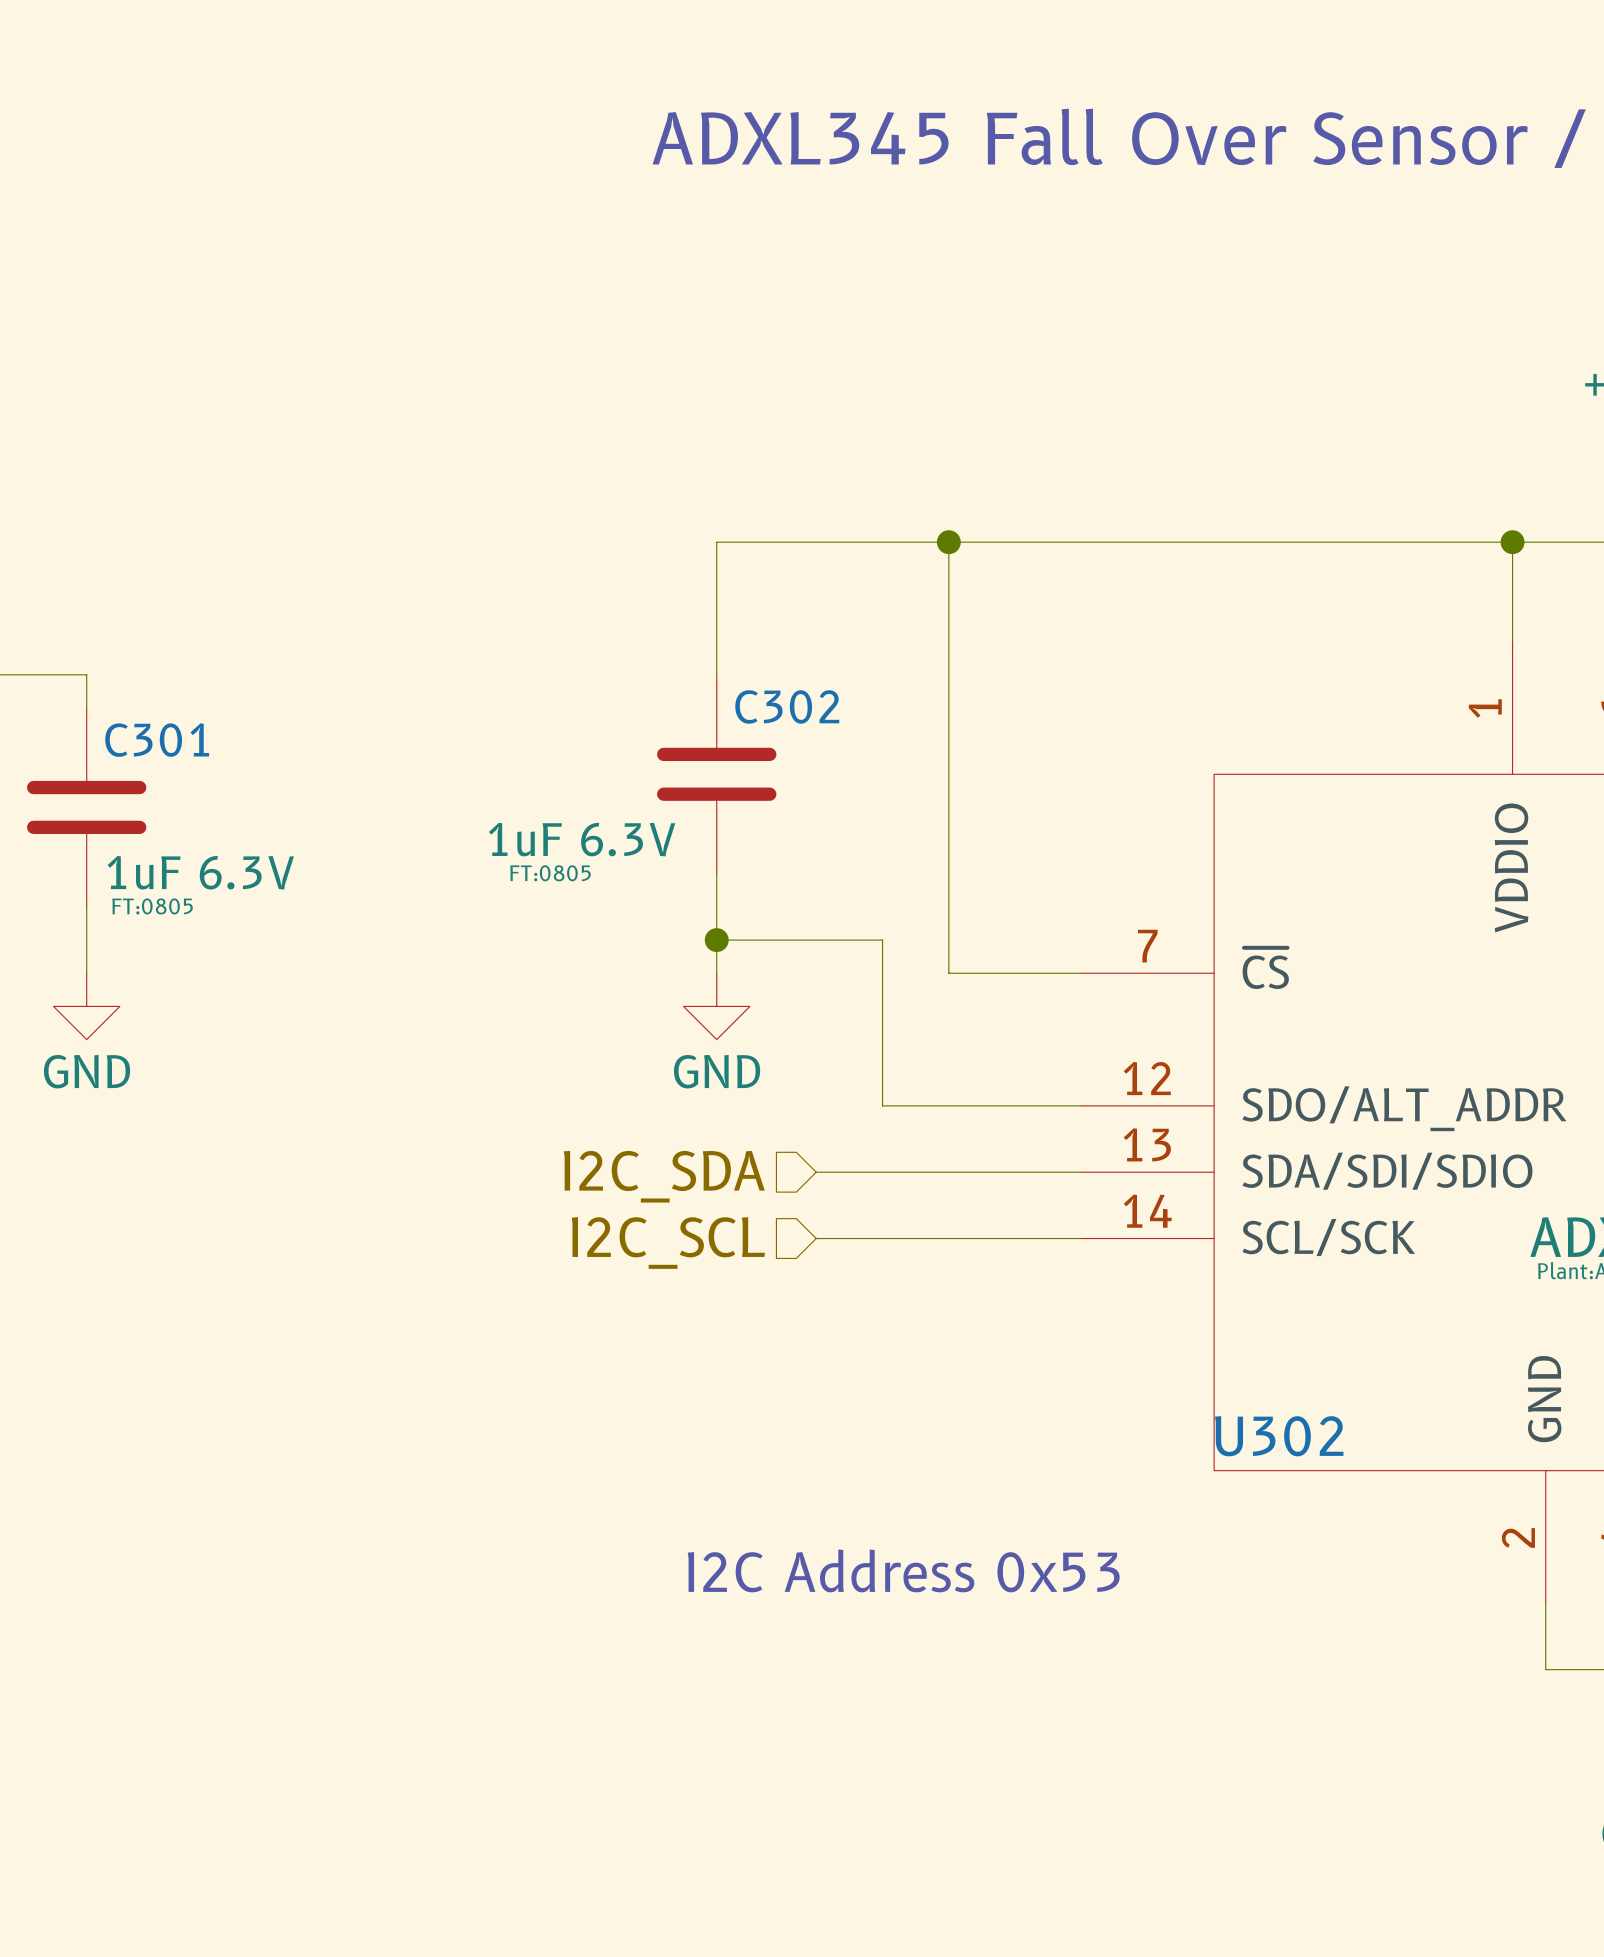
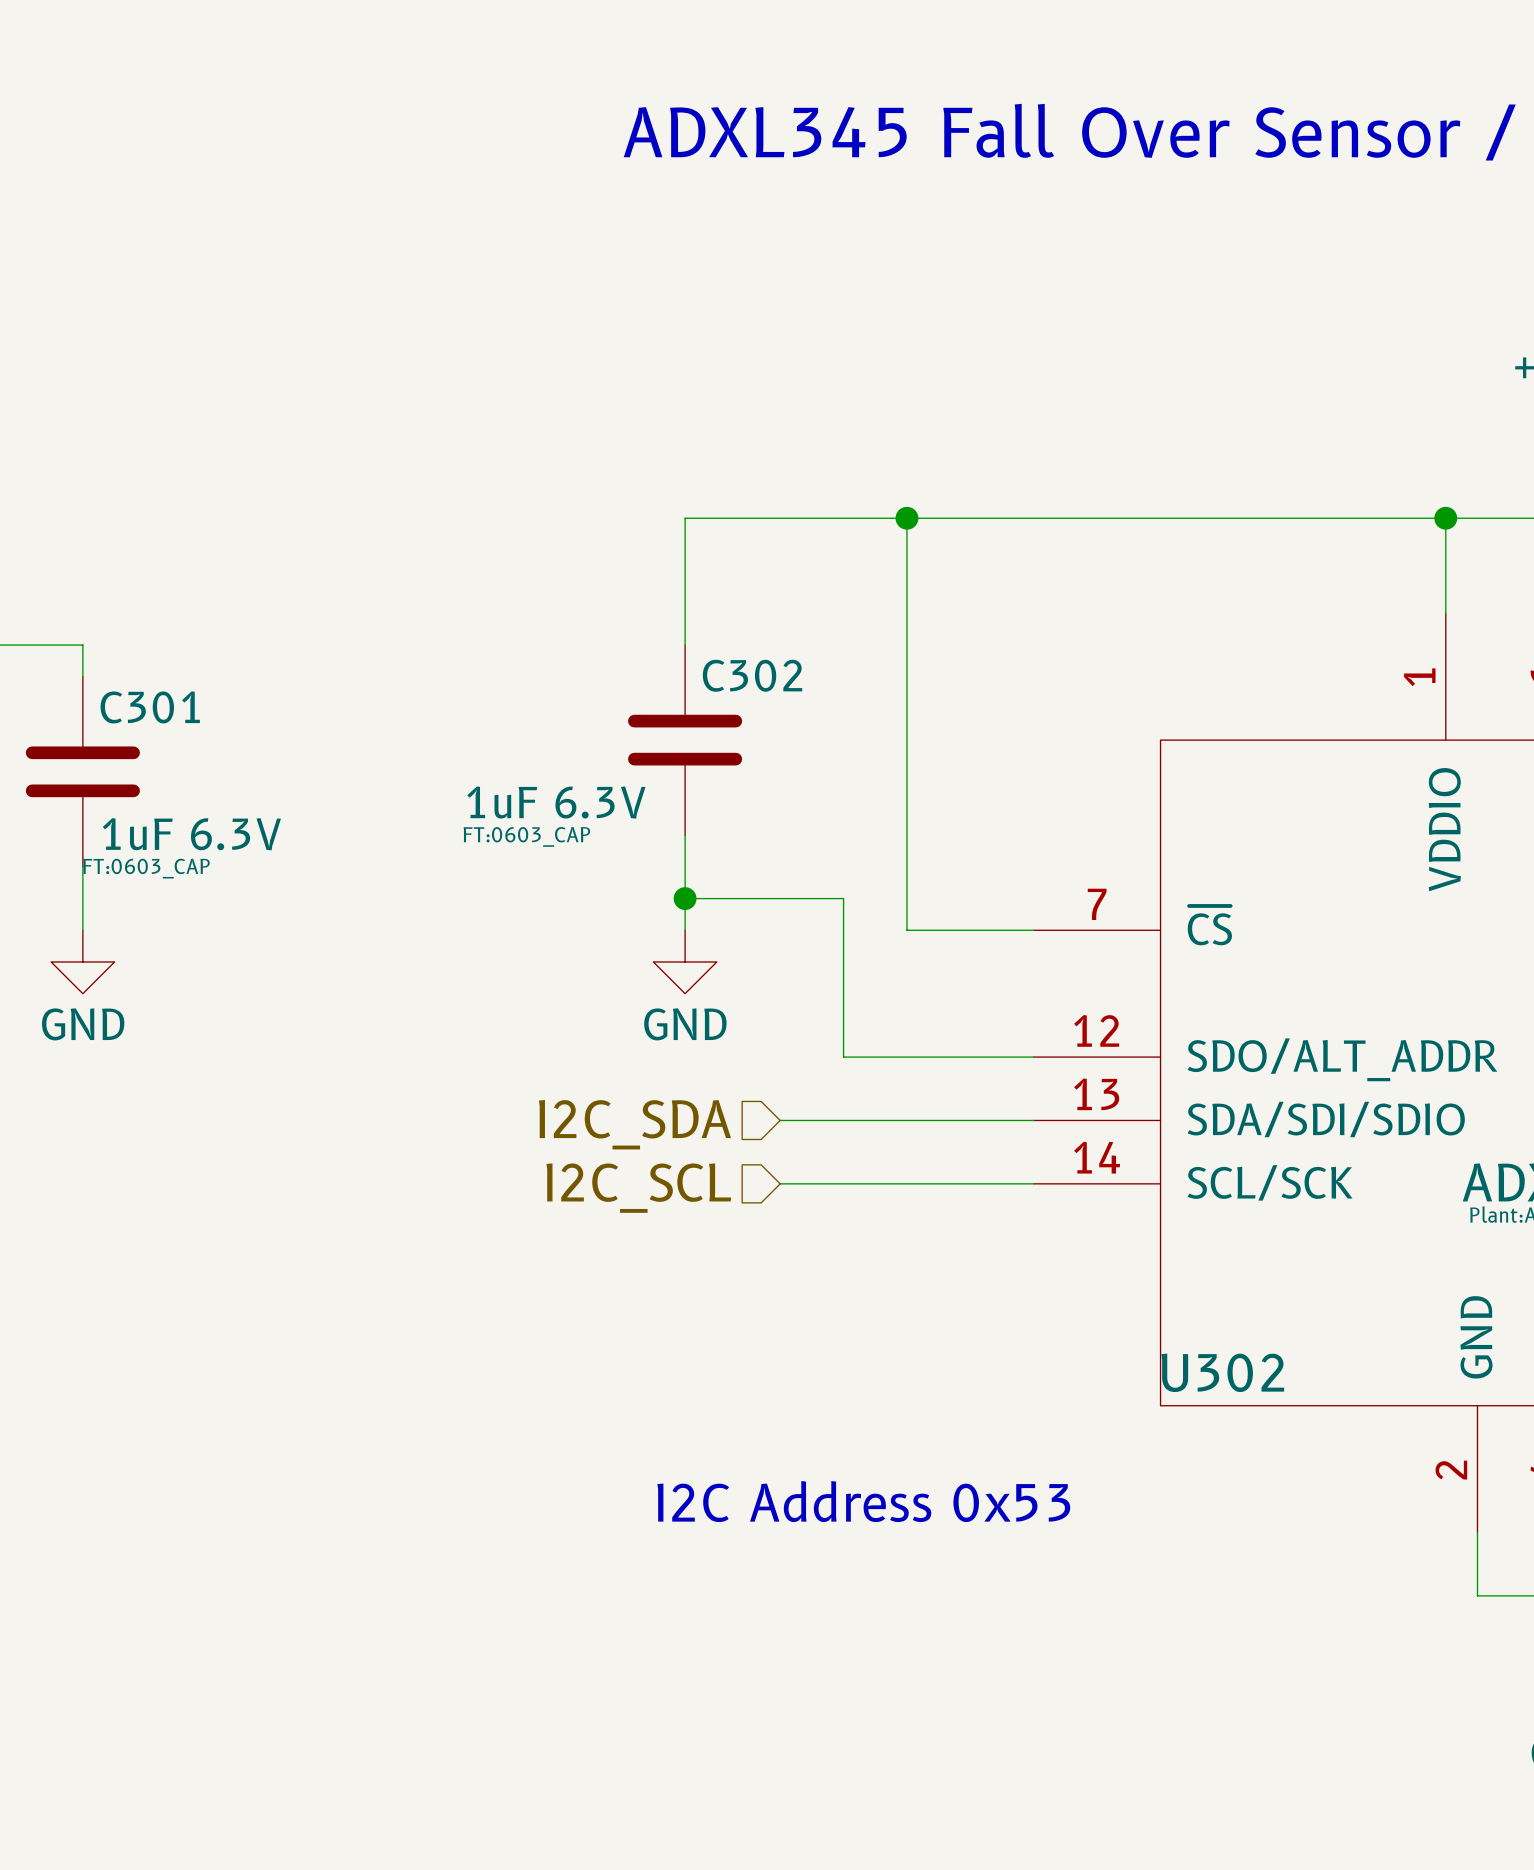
C302 text: FT:0805 (550, 873) -> FT:0603_CAP (526, 836)
C301 text: FT:0805 (152, 906) -> FT:0603_CAP (146, 868)

